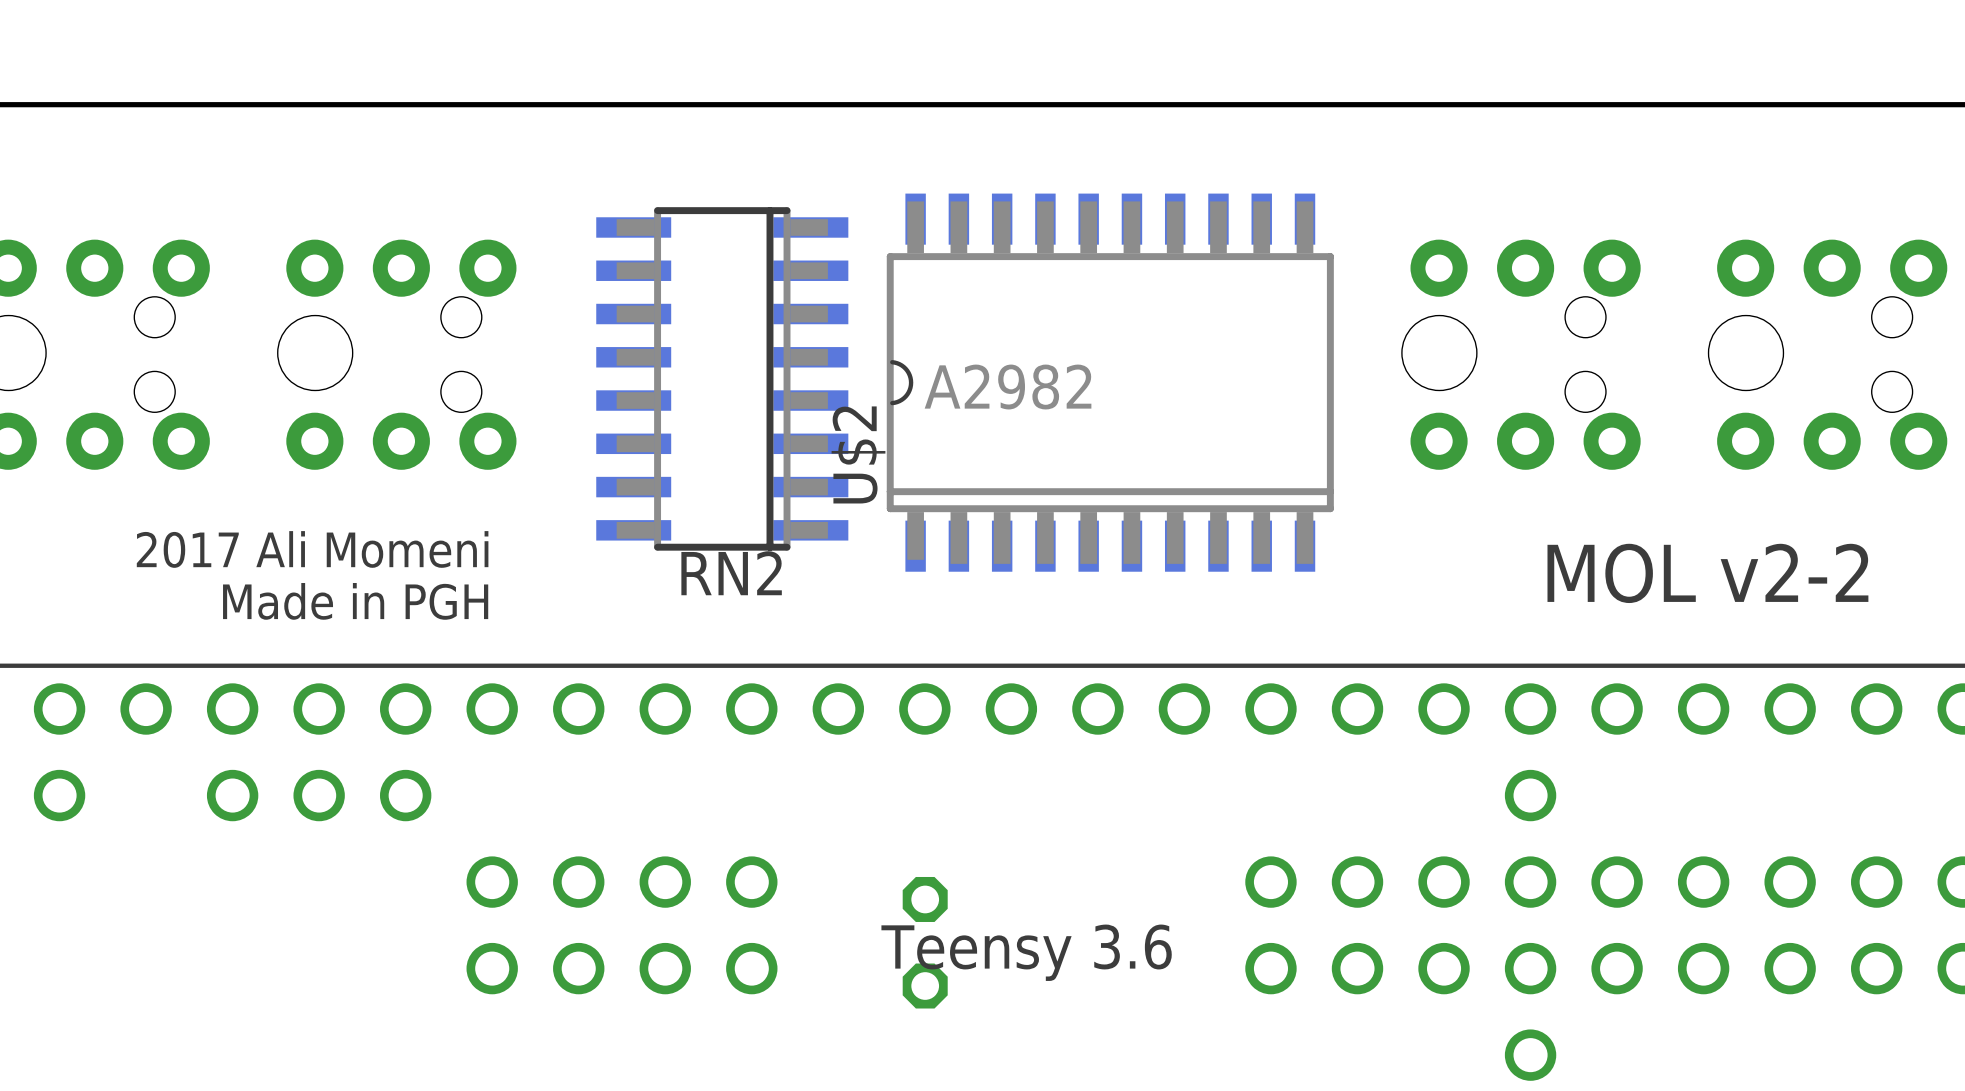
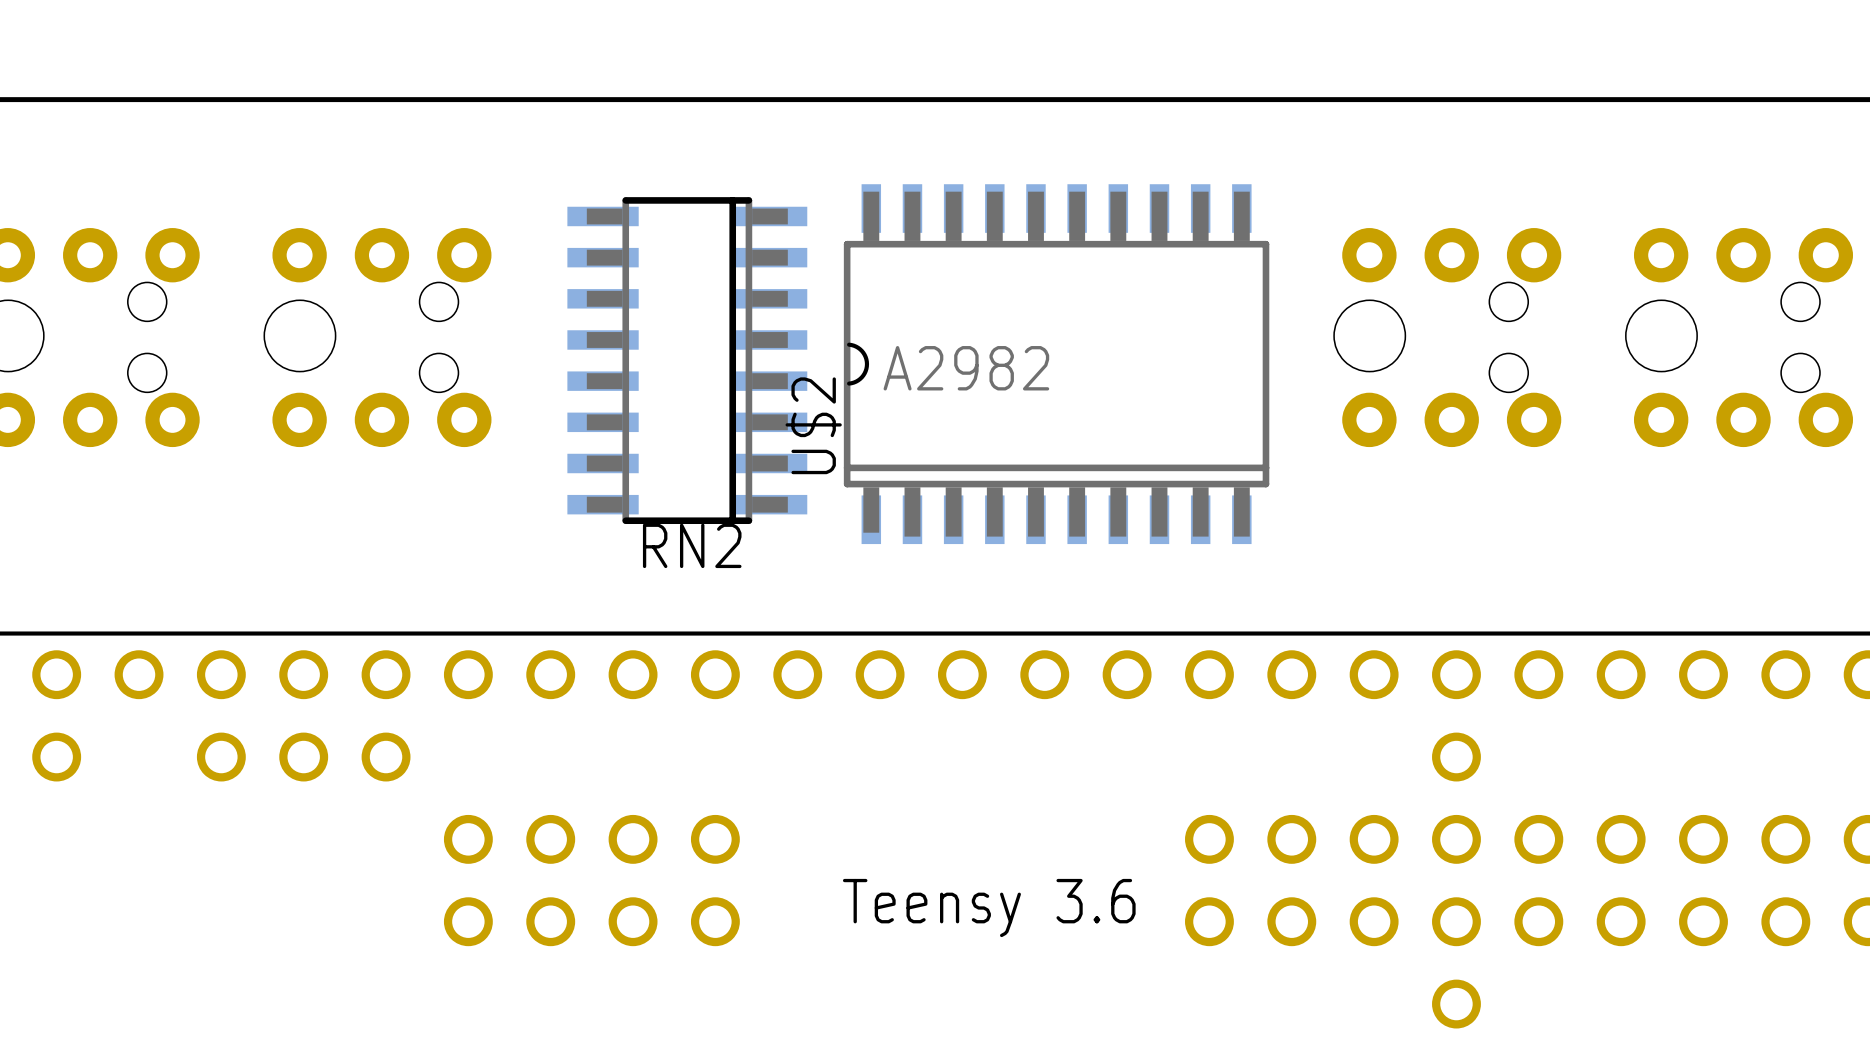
text: 2017 Ali Momeni (312, 549) -> none
text: MOL v2-2 (1707, 573) -> none
text: Made in PGH (355, 601) -> none
part: (925, 942) -> none

